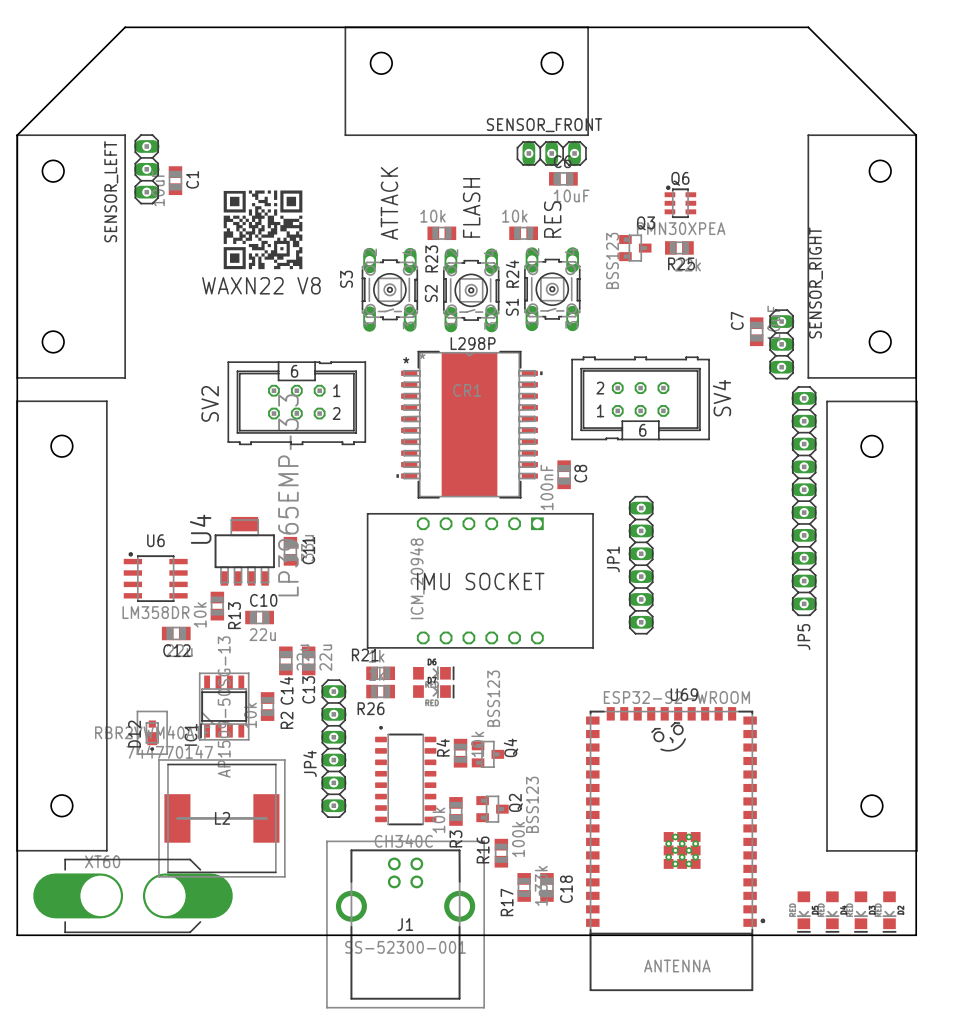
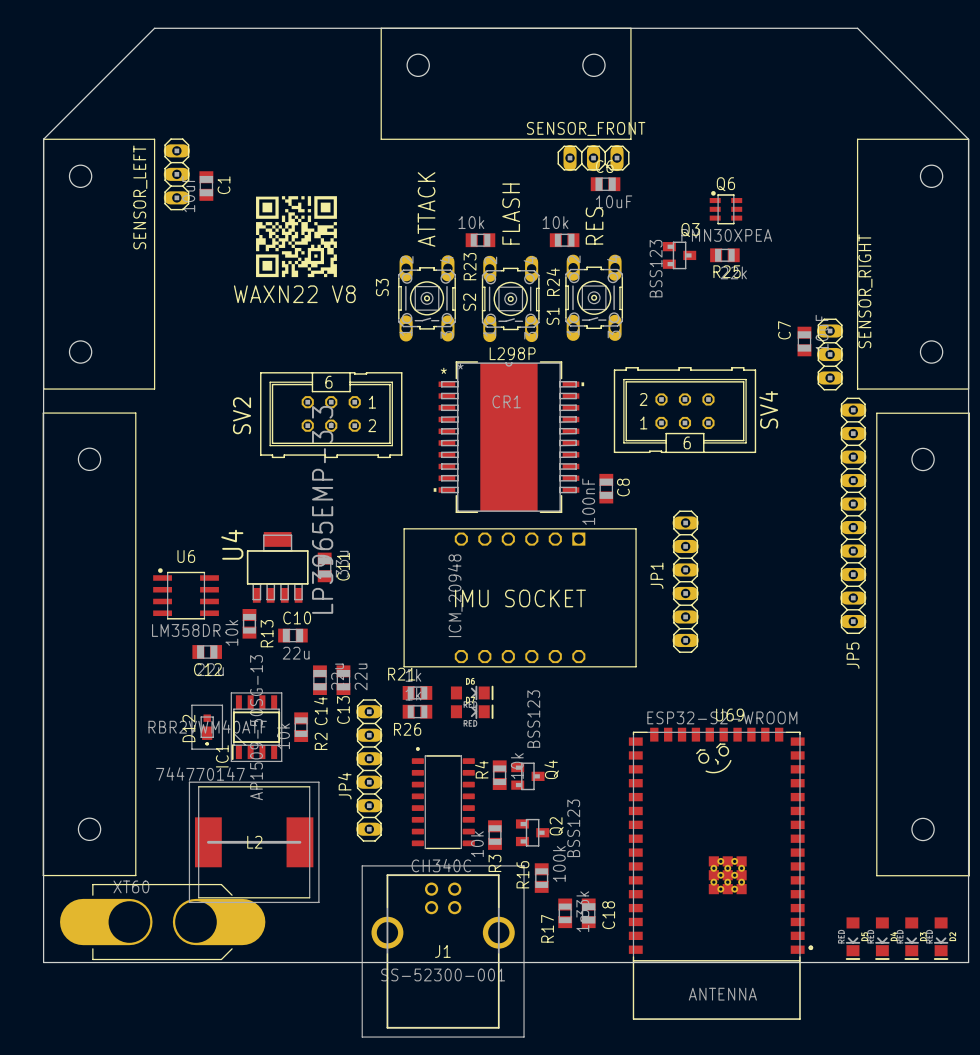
D12 position: (152, 732) -> (207, 727)

